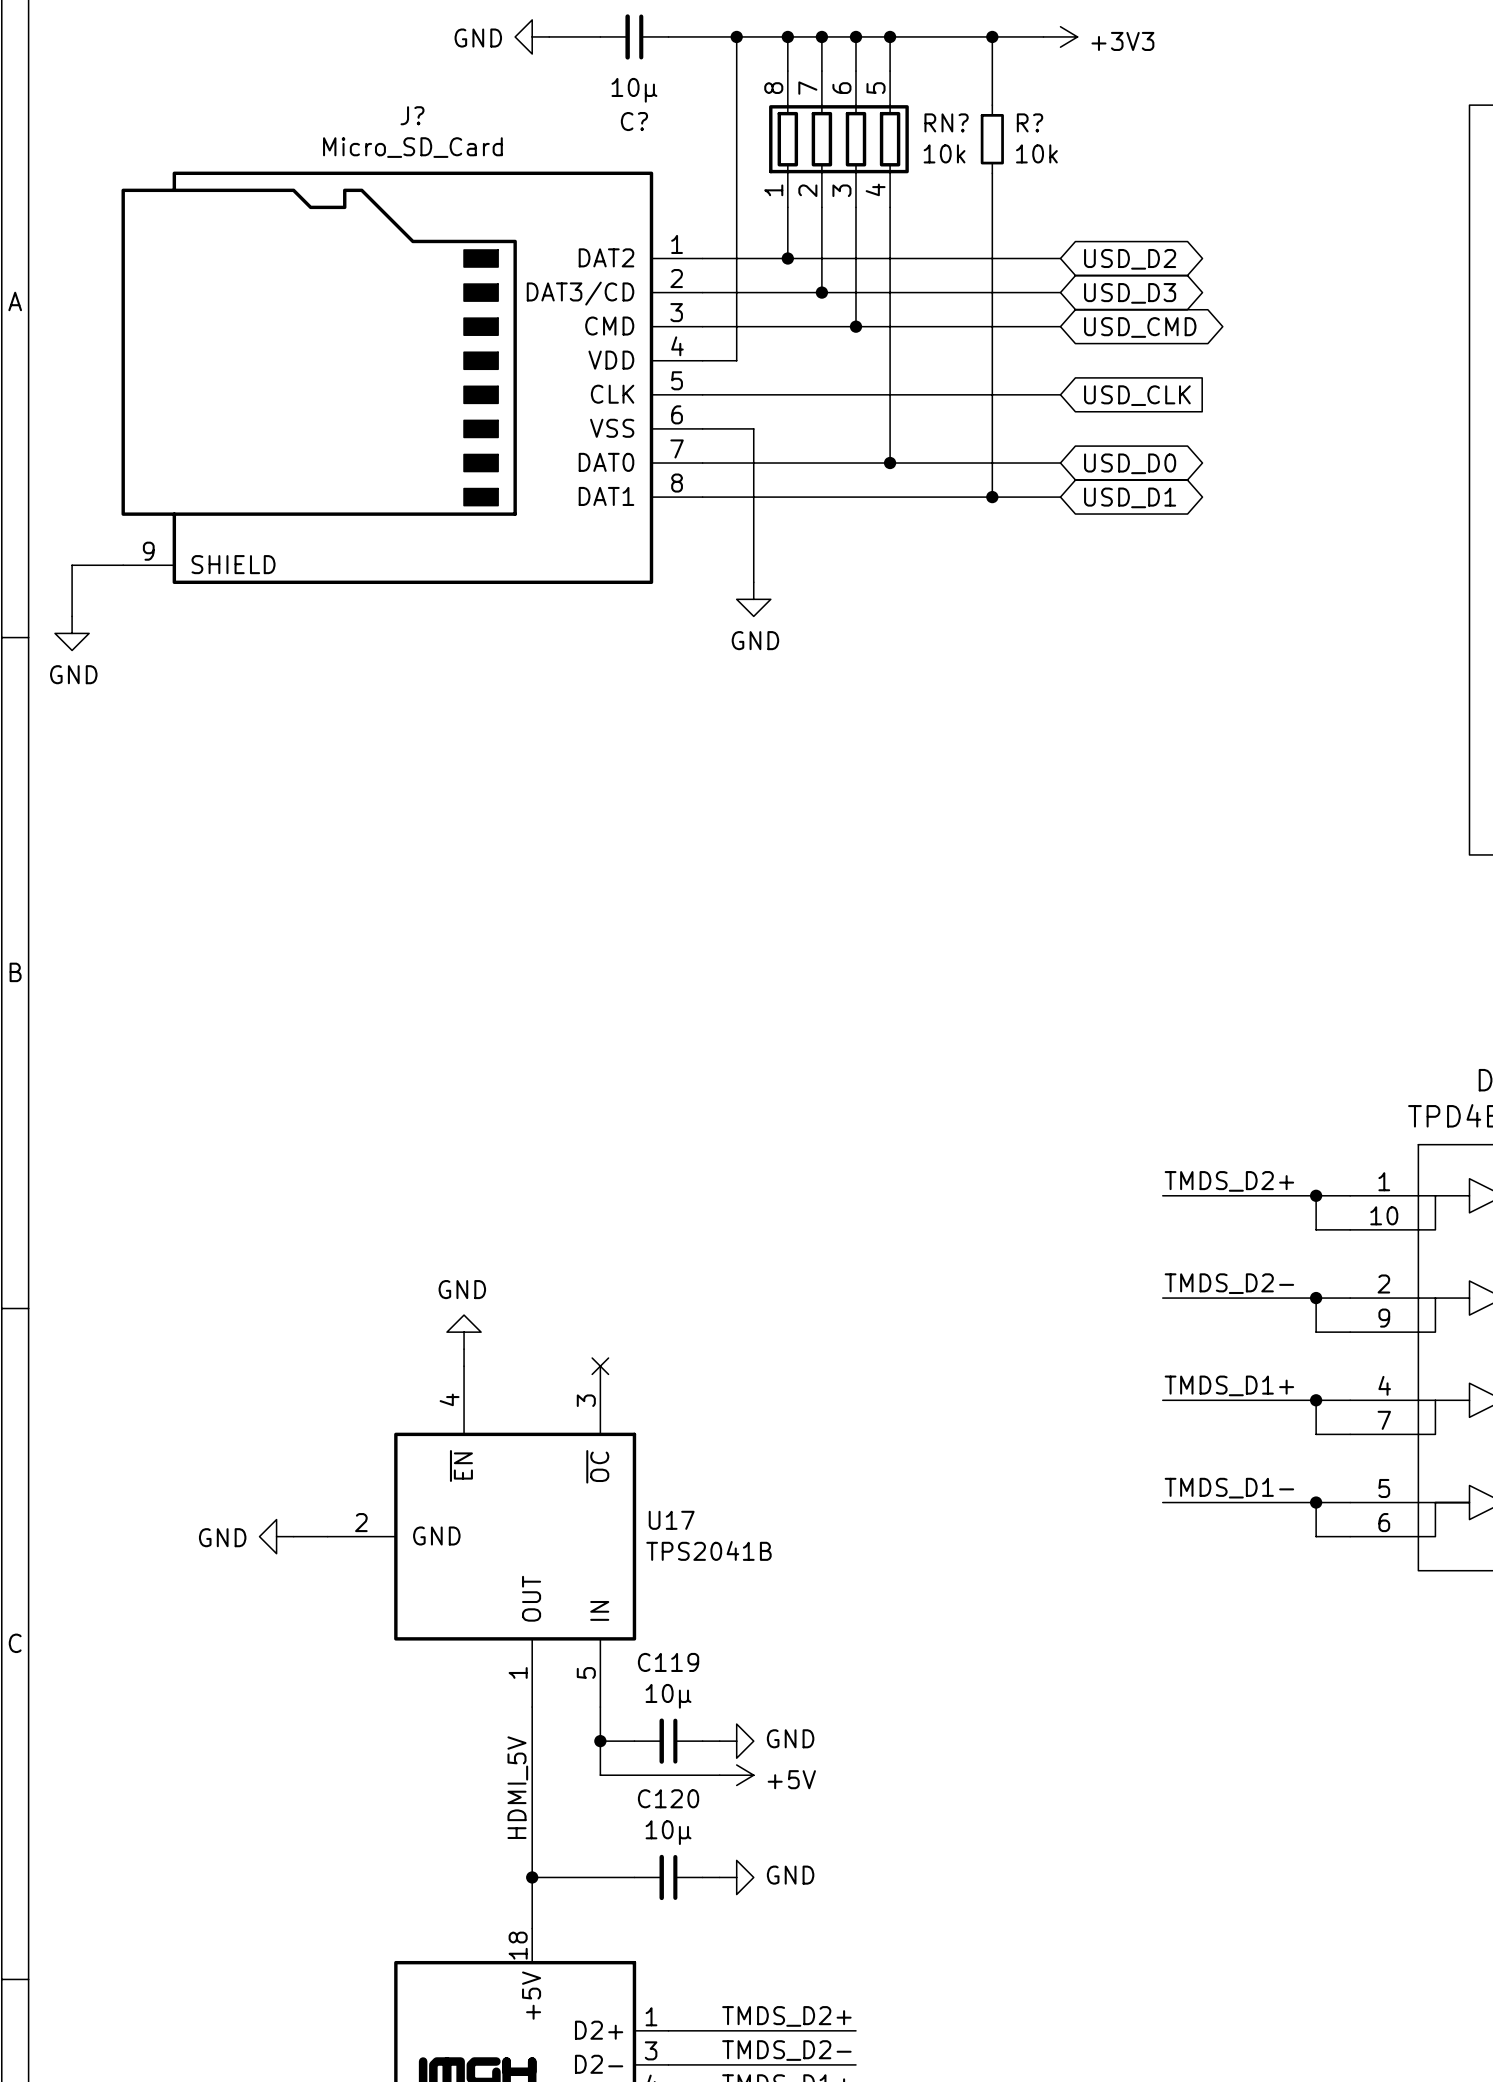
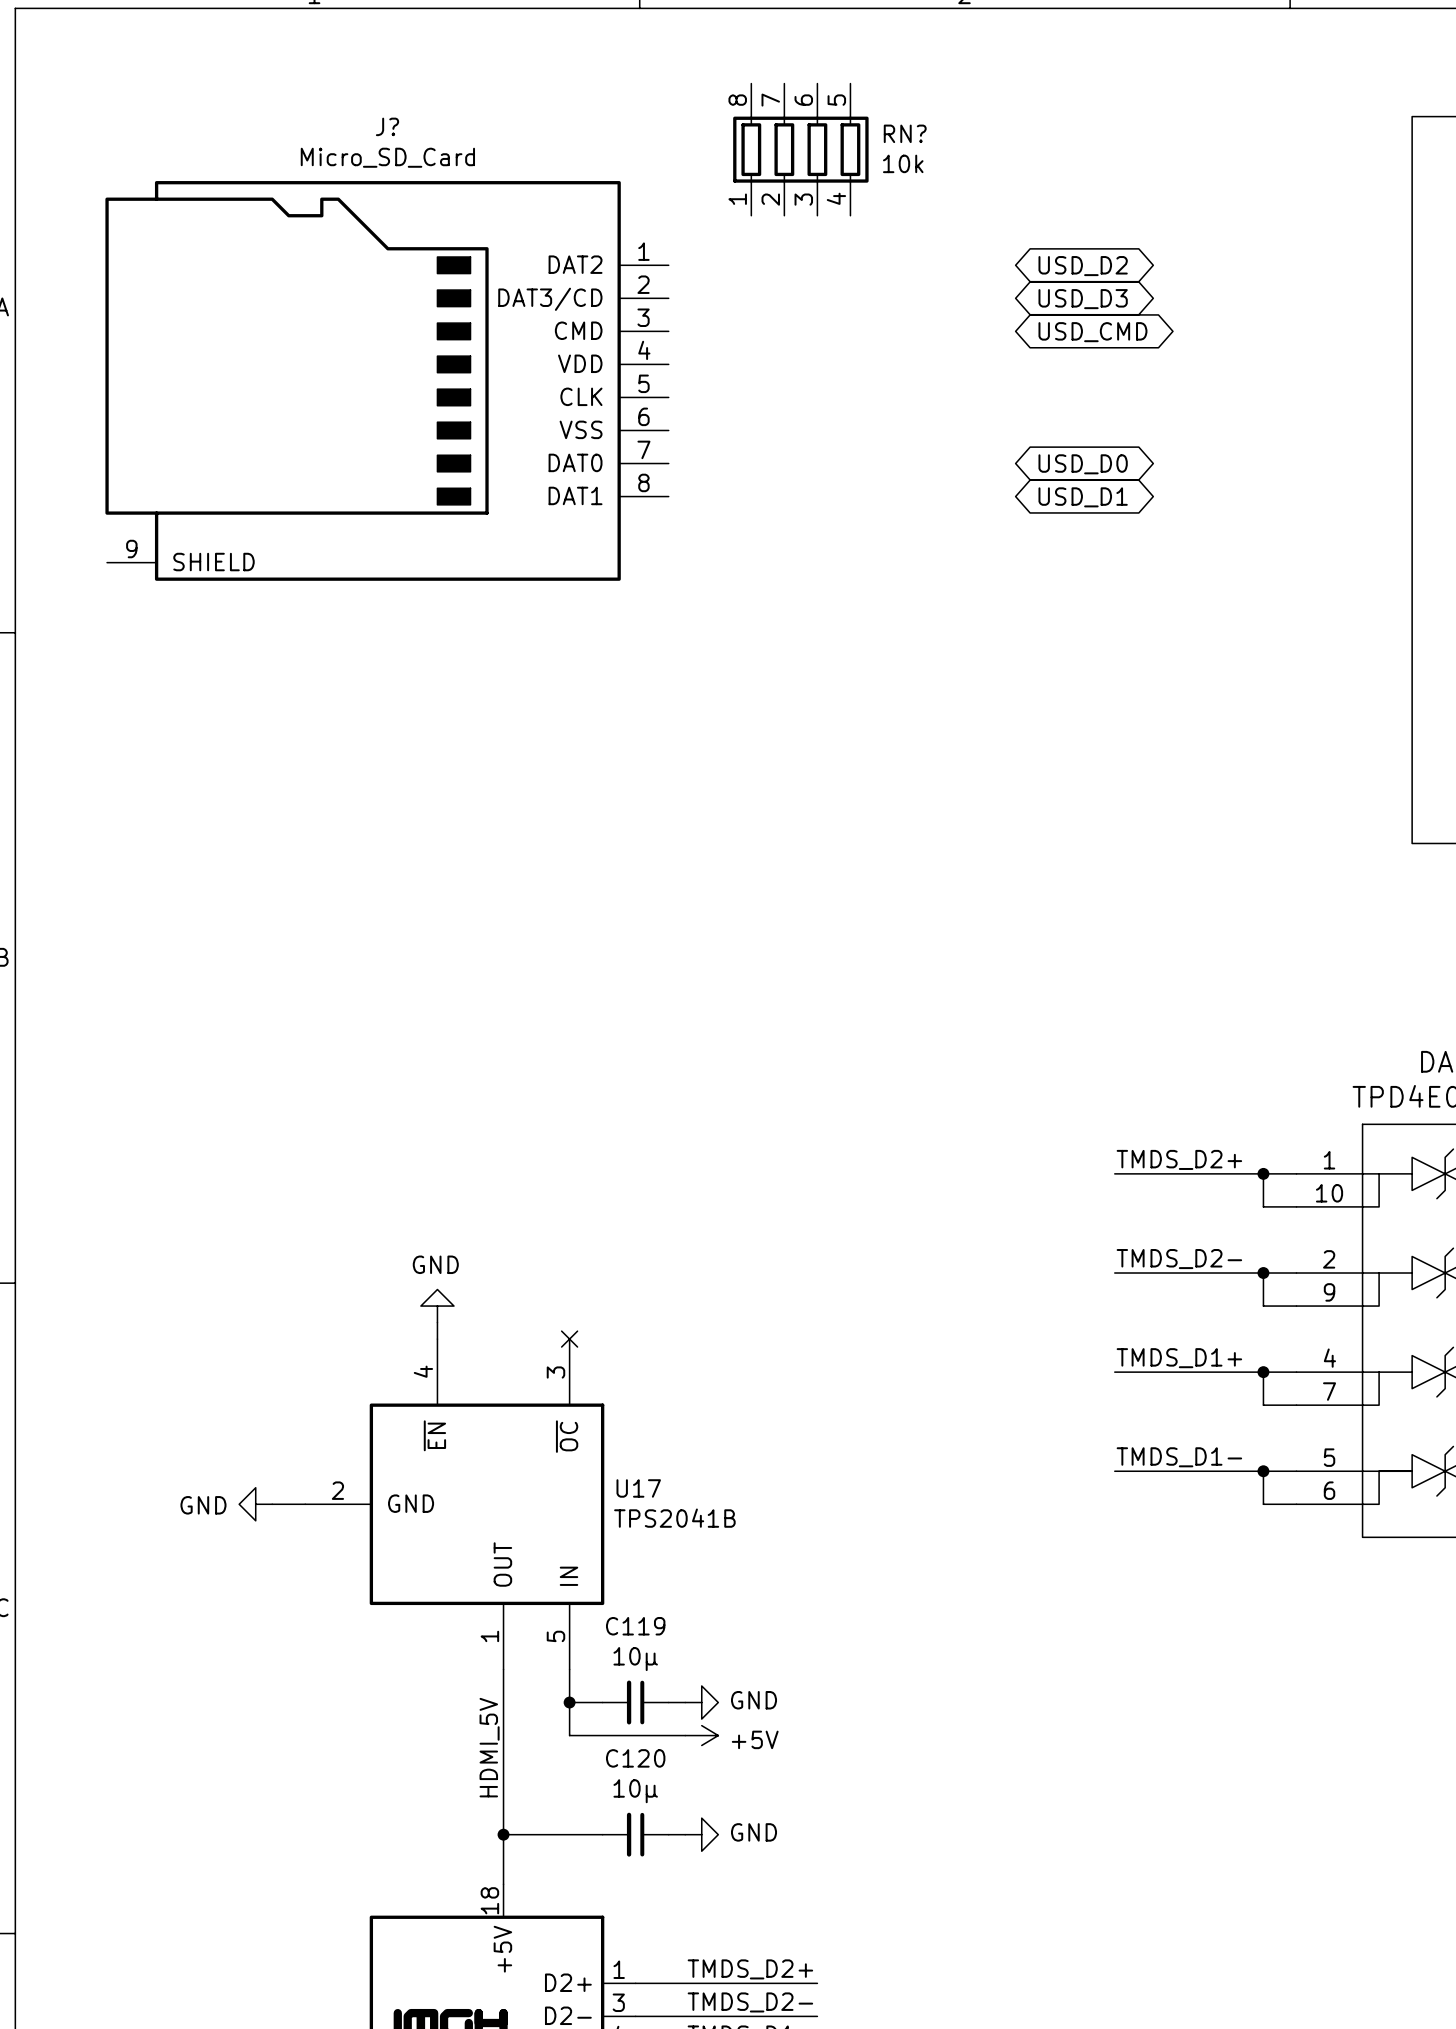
power symbol: GND (532, 36) -> none
wire: (549, 36) (600, 36) -> none
C?: 10µ (634, 36) -> none
wire: (668, 36) (1043, 36) -> none
wire: (736, 36) (736, 360) (702, 360) -> none
junction: (736, 36) -> none
wire: (787, 36) (787, 71) -> none
junction: (787, 36) -> none
wire: (821, 36) (821, 71) -> none
junction: (821, 36) -> none
wire: (855, 36) (855, 71) -> none
junction: (855, 36) -> none
wire: (890, 36) (890, 71) -> none
junction: (890, 36) -> none
wire: (992, 36) (992, 105) -> none
junction: (992, 36) -> none
power symbol: +3V3 (1060, 36) -> none
R?: 10k (992, 139) -> none
wire: (992, 173) (992, 497) -> none
wire: (787, 207) (787, 258) -> none
wire: (821, 207) (821, 292) -> none
wire: (855, 207) (855, 326) -> none
wire: (890, 207) (890, 463) -> none
wire: (702, 258) (1060, 258) -> none
junction: (787, 258) -> none
wire: (702, 292) (1060, 292) -> none
junction: (821, 292) -> none
wire: (702, 326) (1060, 326) -> none
junction: (855, 326) -> none
wire: (702, 394) (1060, 394) -> none
global label: USD_CLK (1137, 395) -> none
wire: (702, 428) (753, 428) (753, 582) -> none
wire: (702, 463) (1060, 463) -> none
junction: (890, 463) -> none
wire: (702, 497) (1060, 497) -> none
junction: (992, 497) -> none
wire: (123, 565) (72, 565) (72, 616) -> none
power symbol: GND (753, 599) -> none
power symbol: GND (72, 633) -> none

